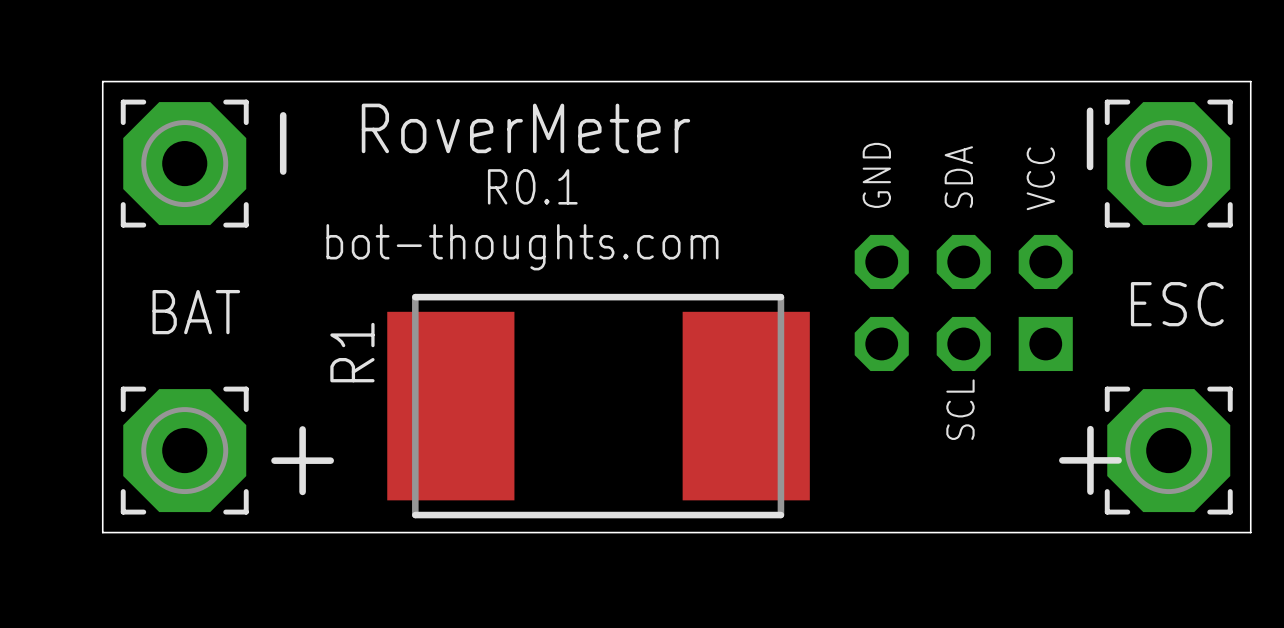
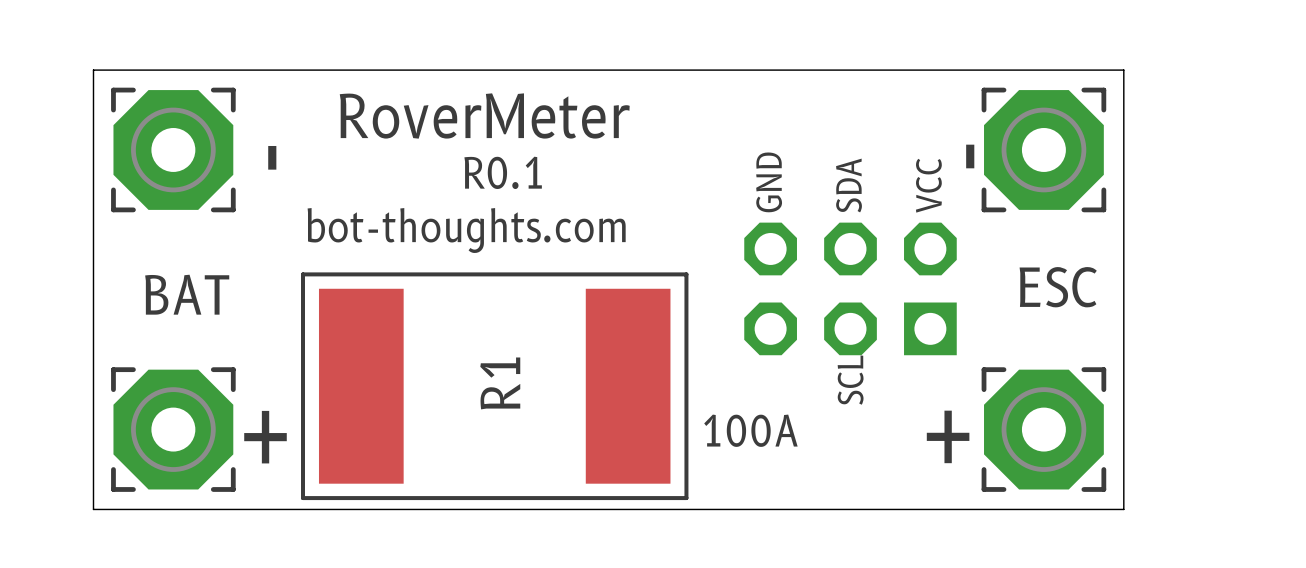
board edge: (1160, 81) (1250, 81) (1250, 532) (1160, 532) -> (1123, 70) (1123, 509)
text position: - (1090, 138) -> - (970, 156)
part position: (1168, 163) -> (1043, 149)
text position: GND (876, 175) -> GND (769, 182)
text position: SDA (958, 177) -> SDA (849, 185)
text position: VCC (1040, 178) -> VCC (928, 185)
R1 footprint: [387, 293, 810, 519] -> [301, 272, 689, 501]
part position: (963, 302) -> (850, 288)
text position: ESC (1177, 304) -> ESC (1058, 287)
R1 name position: R1 (352, 352) -> R1 (500, 383)
text position: SCL (960, 409) -> SCL (850, 380)
part position: (1168, 450) -> (1043, 429)
text: none -> 100A (750, 430)
text position: + (1090, 460) -> + (948, 436)

